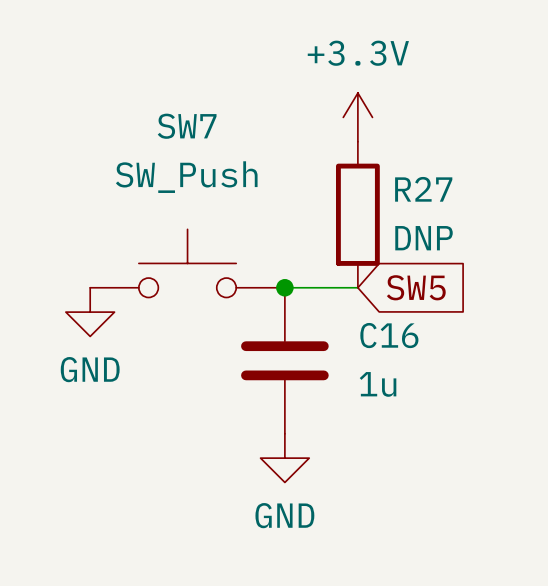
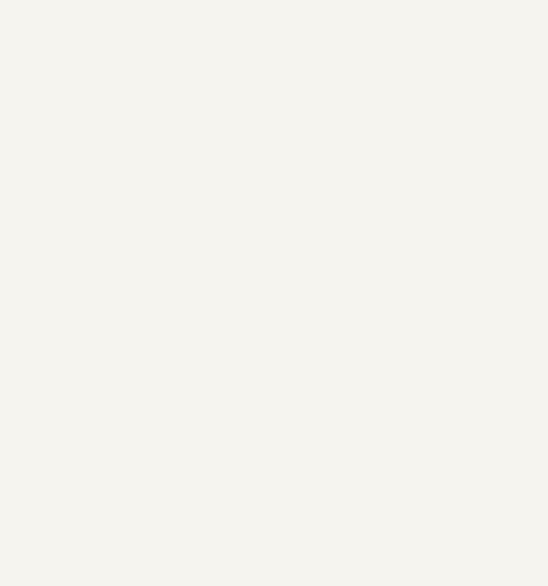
power symbol: +3.3V (357, 117) -> none
R27: DNP (357, 214) -> none
SW7: SW_Push (187, 263) -> none
wire: (284, 287) (357, 287) -> none
junction: (284, 287) -> none
global label: SW5 (416, 287) -> none
power symbol: GND (90, 312) -> none
C16: 1u (284, 360) -> none
power symbol: GND (284, 458) -> none

